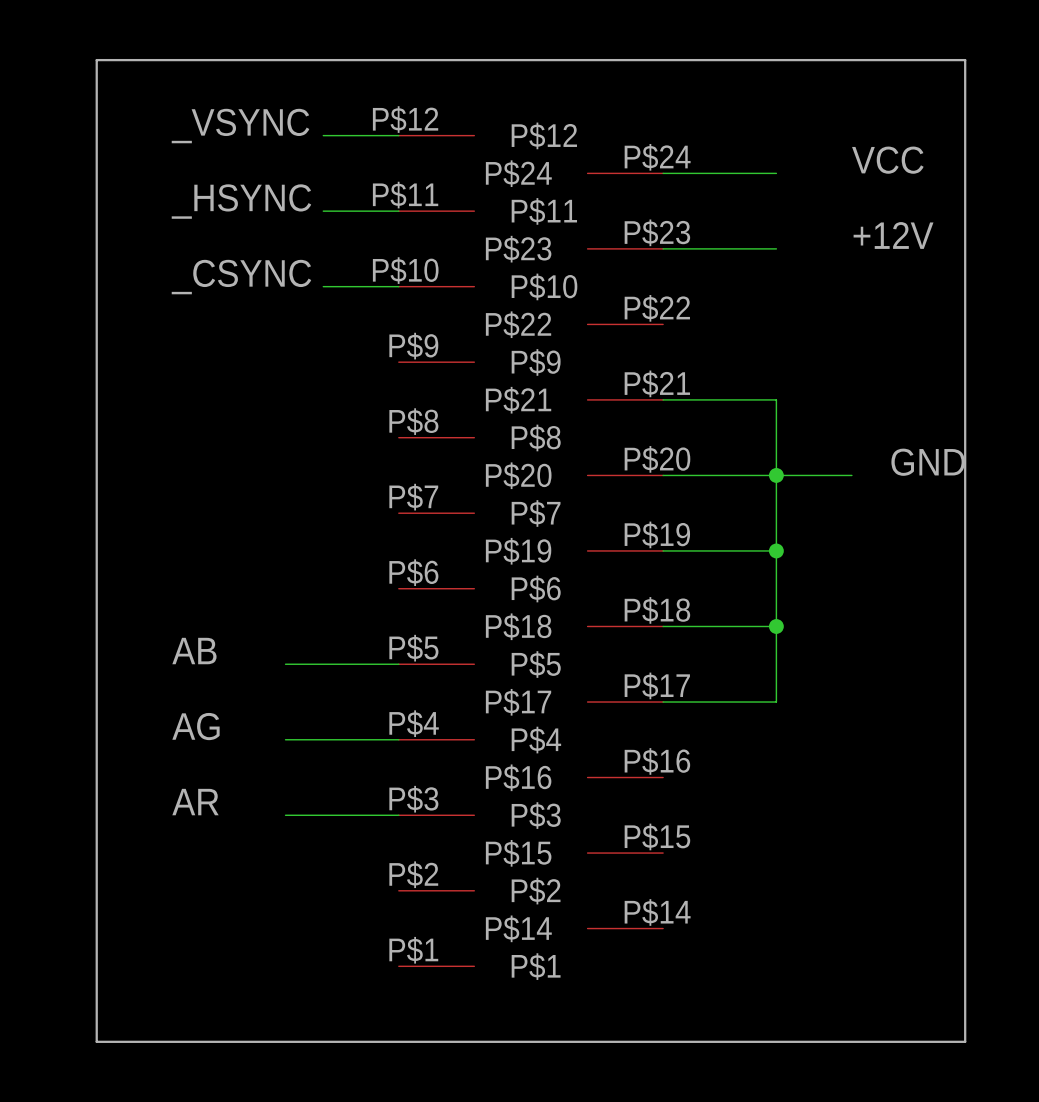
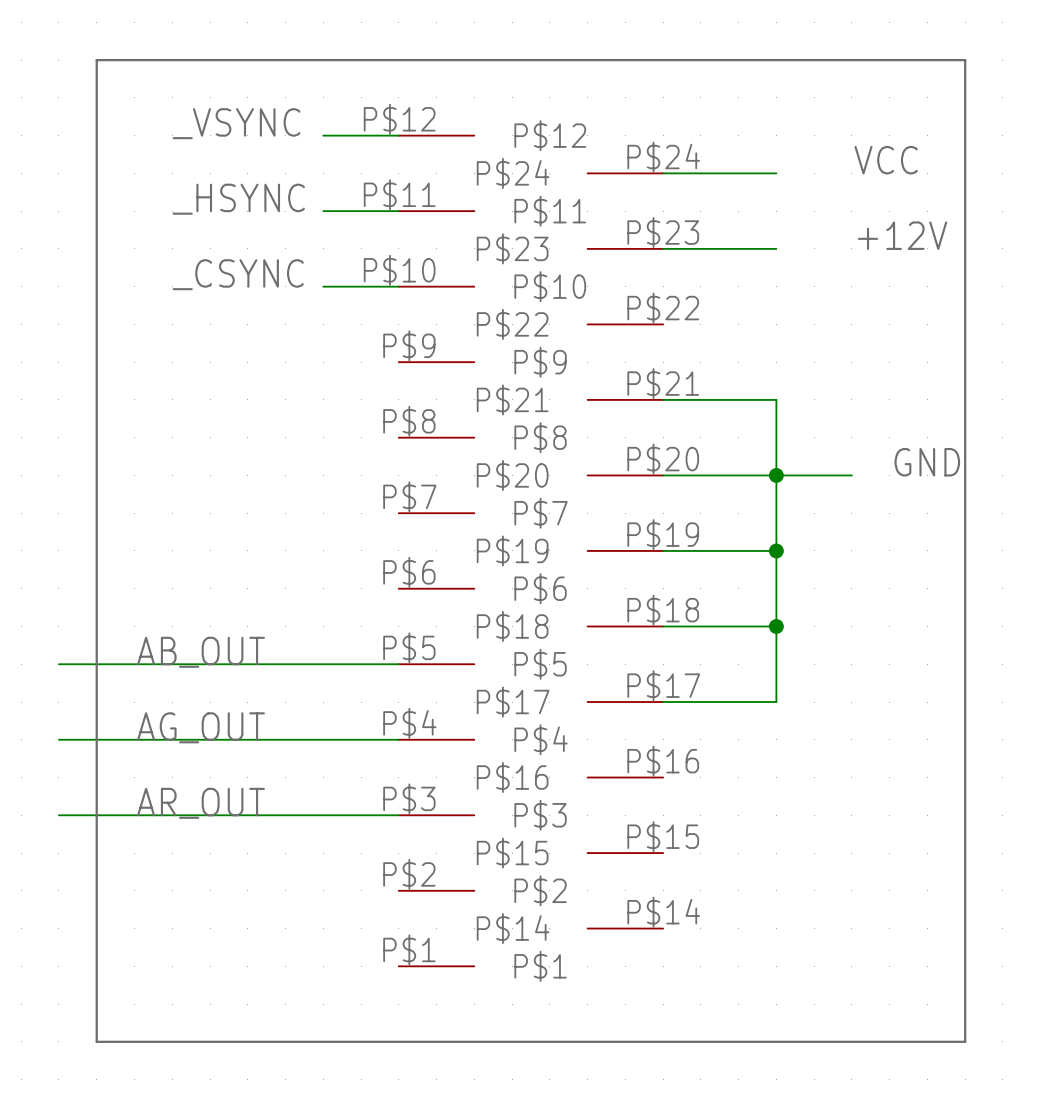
label: AB (194, 651) -> none
label: none -> AB_OUT (201, 652)
wire: none -> (58, 664) (285, 664)
label: AG (195, 726) -> none
label: none -> AG_OUT (201, 727)
wire: none -> (58, 739) (285, 739)
label: AR (195, 802) -> none
label: none -> AR_OUT (201, 803)
wire: none -> (58, 815) (285, 815)

